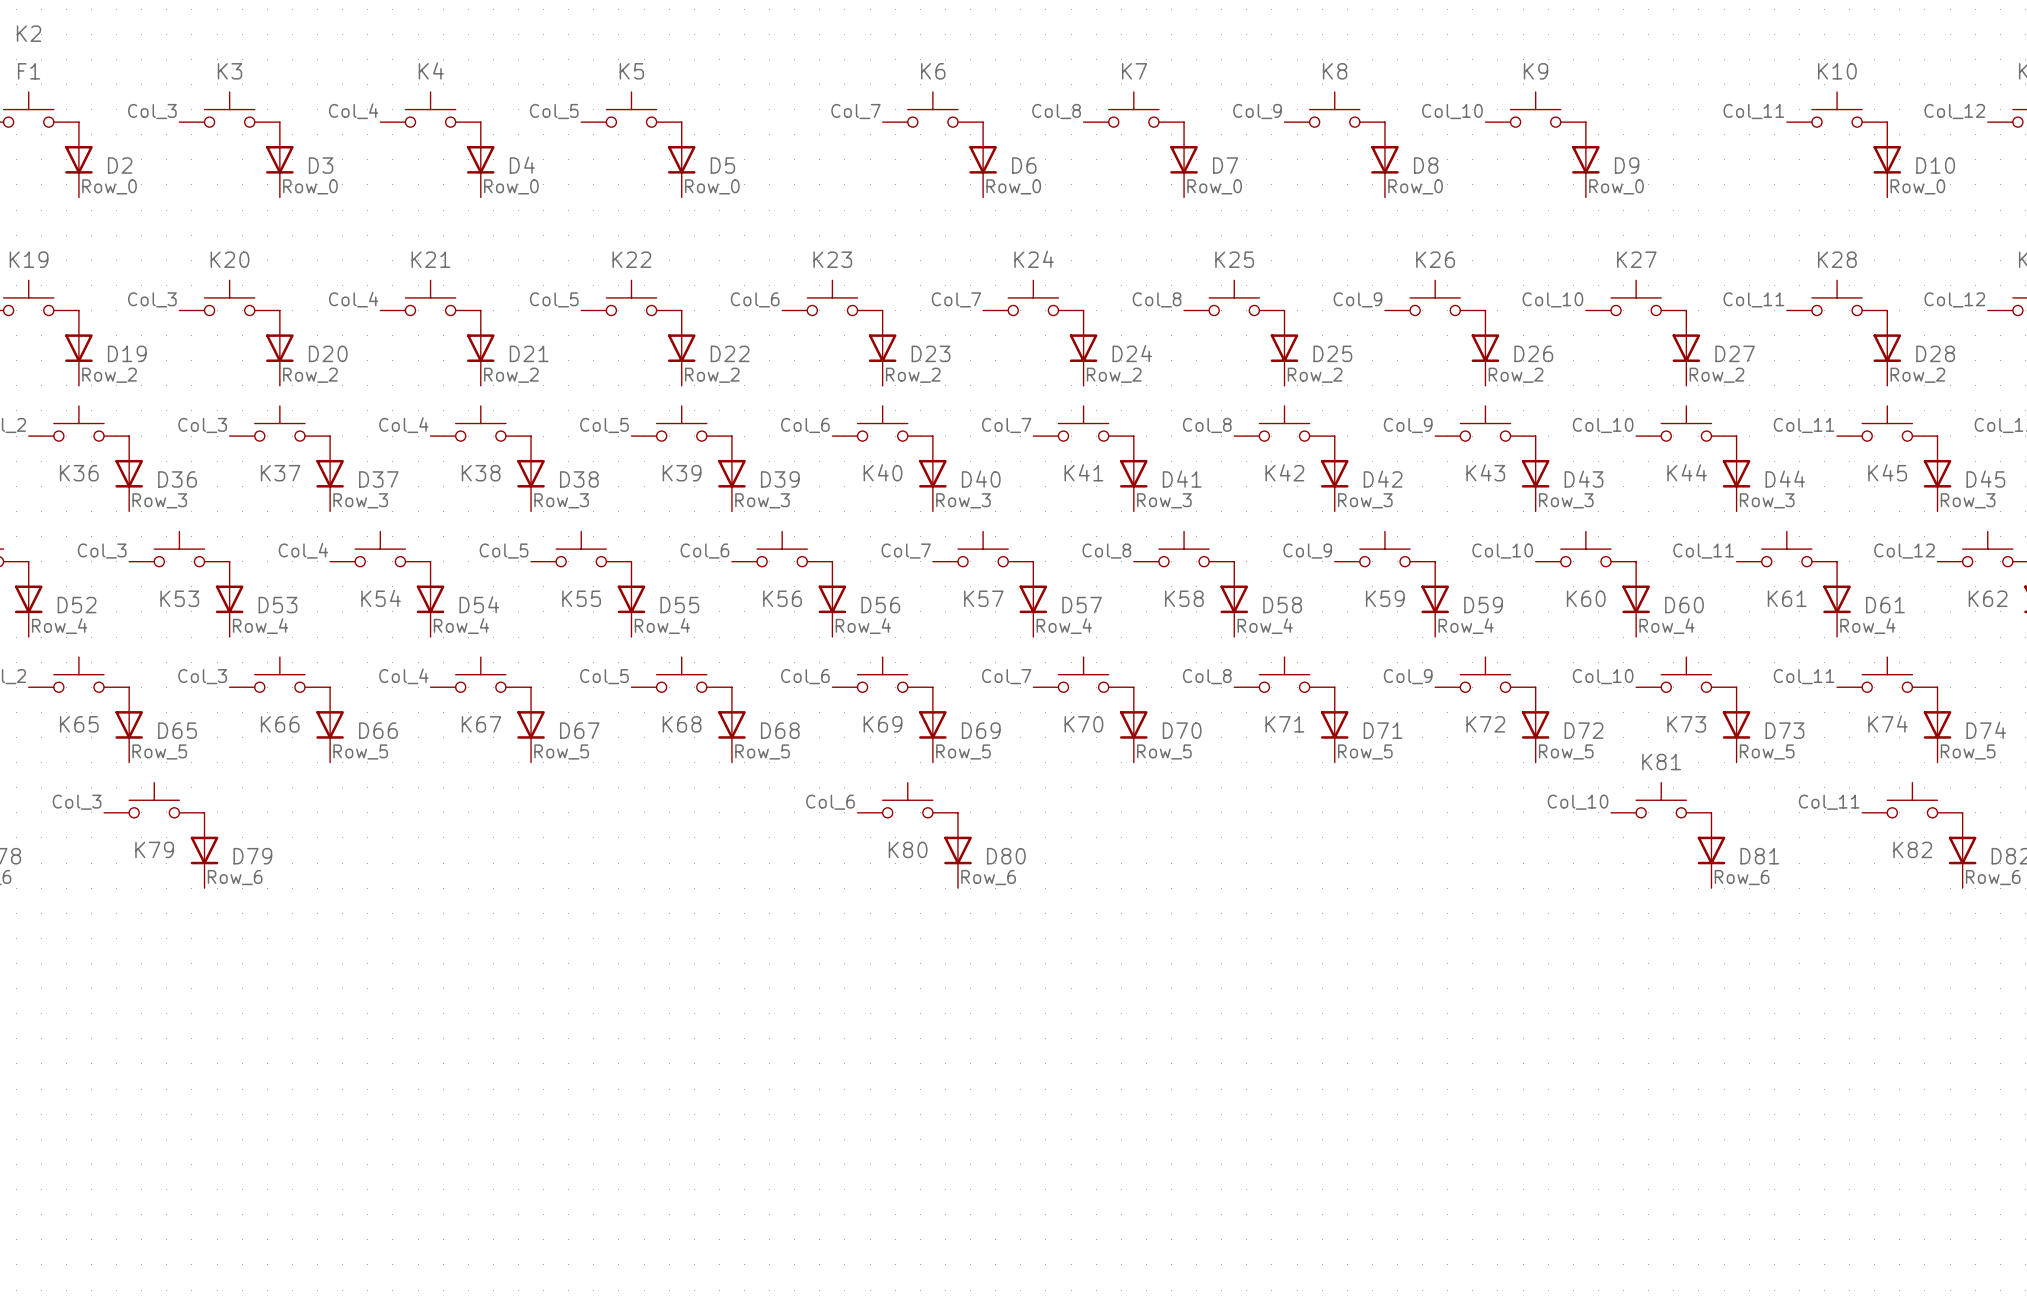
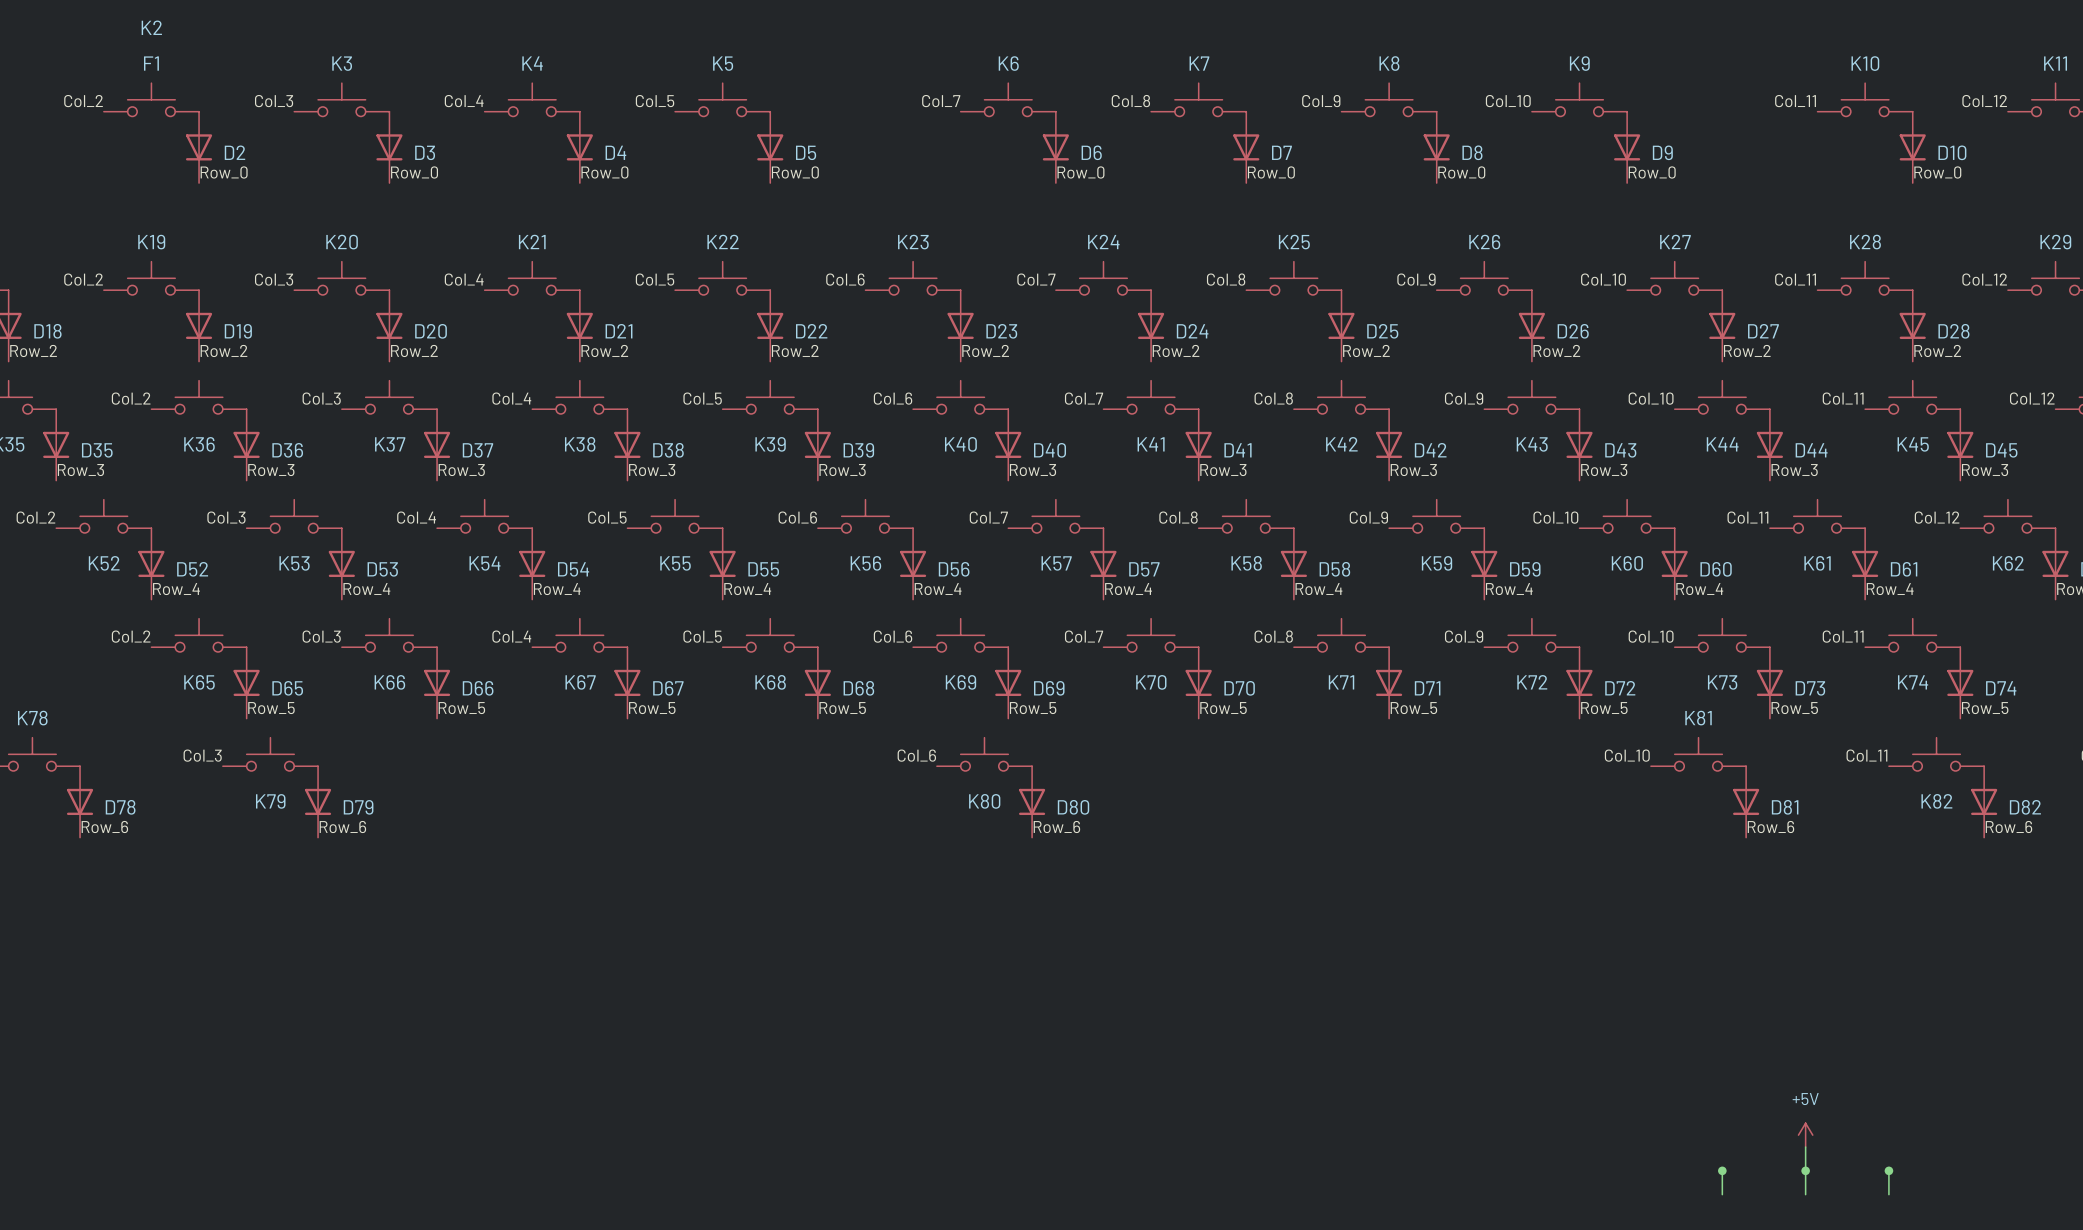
power symbol: none -> +5V (1805, 1135)
wire: none -> (1805, 1147) (1805, 1194)
wire: none -> (1722, 1170) (1722, 1194)
junction: none -> (1722, 1170)
junction: none -> (1805, 1170)
wire: none -> (1888, 1170) (1888, 1194)
junction: none -> (1888, 1170)

